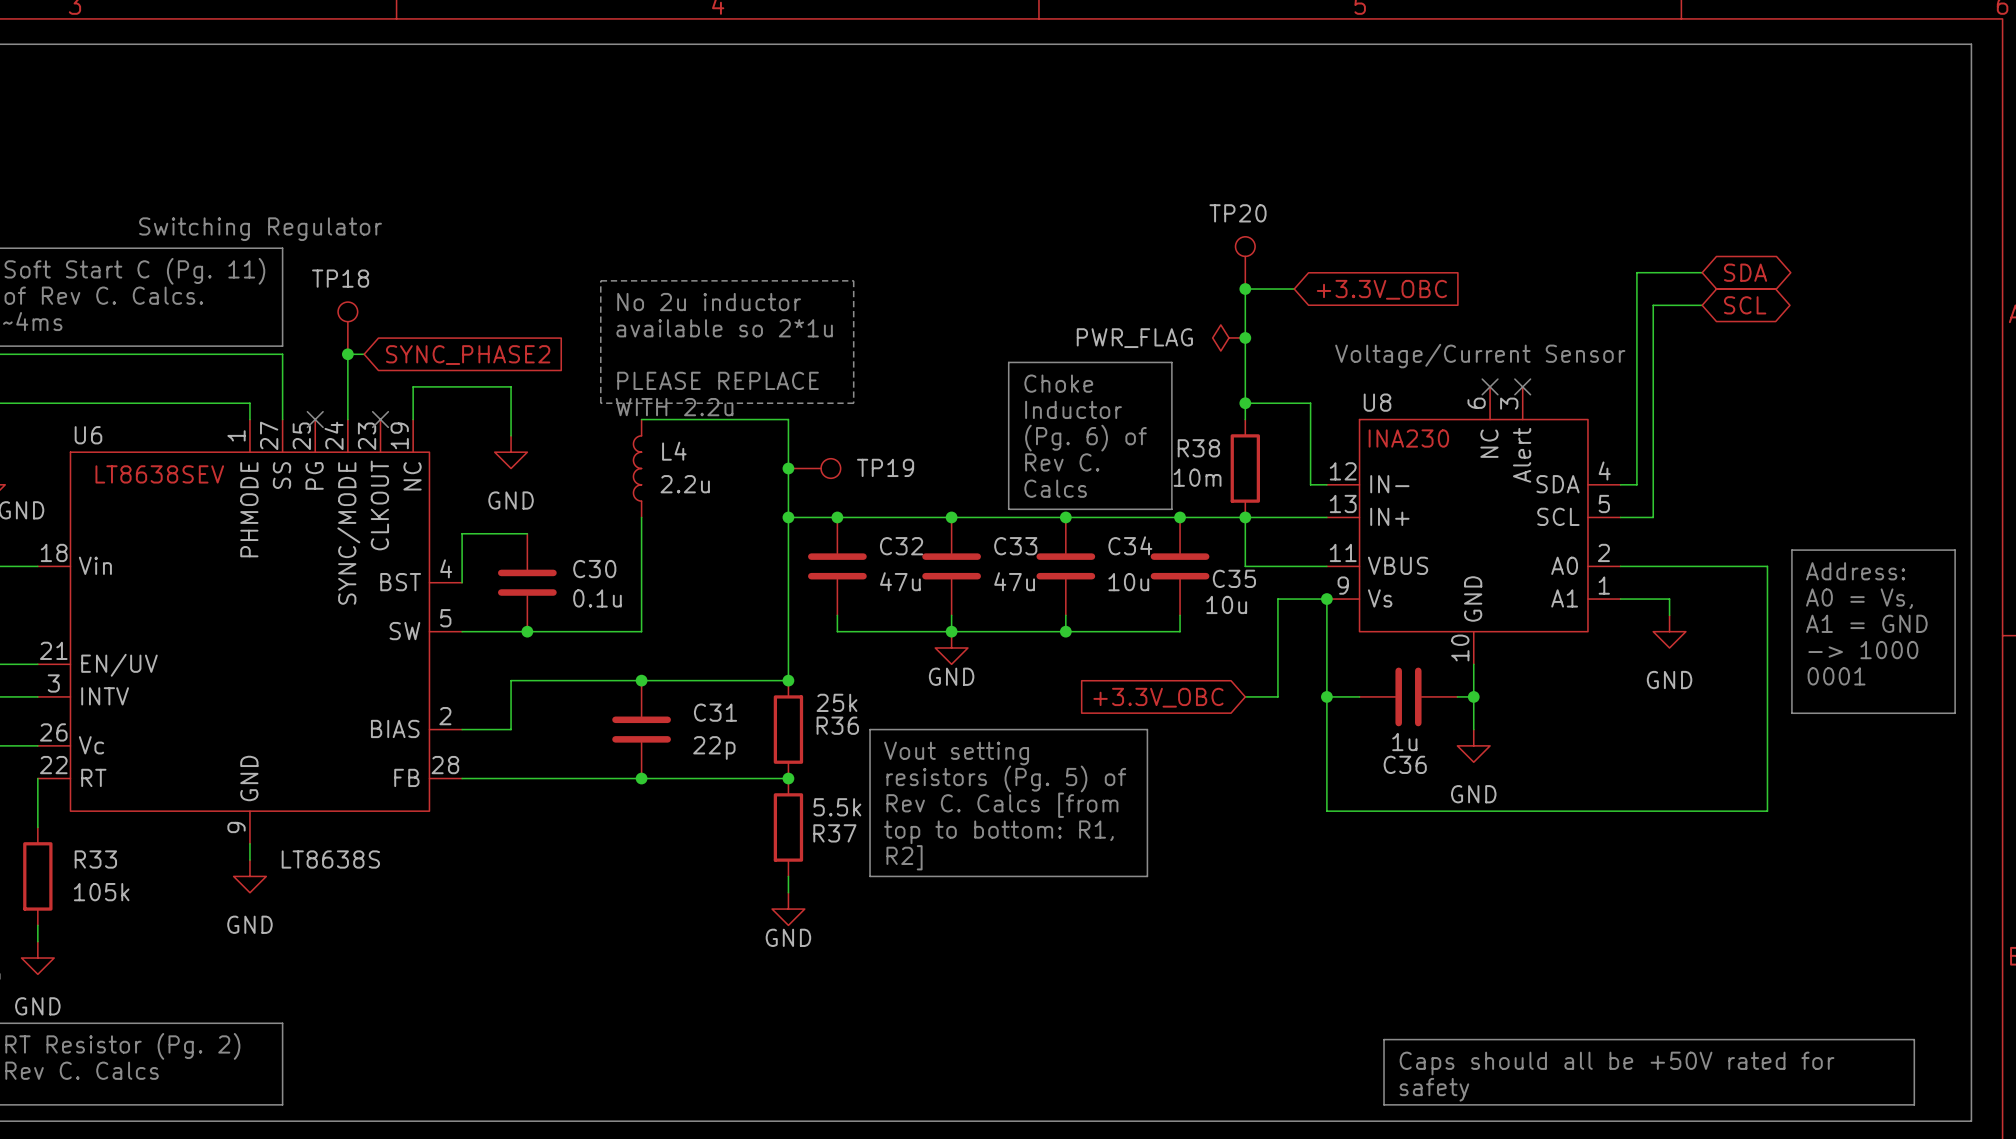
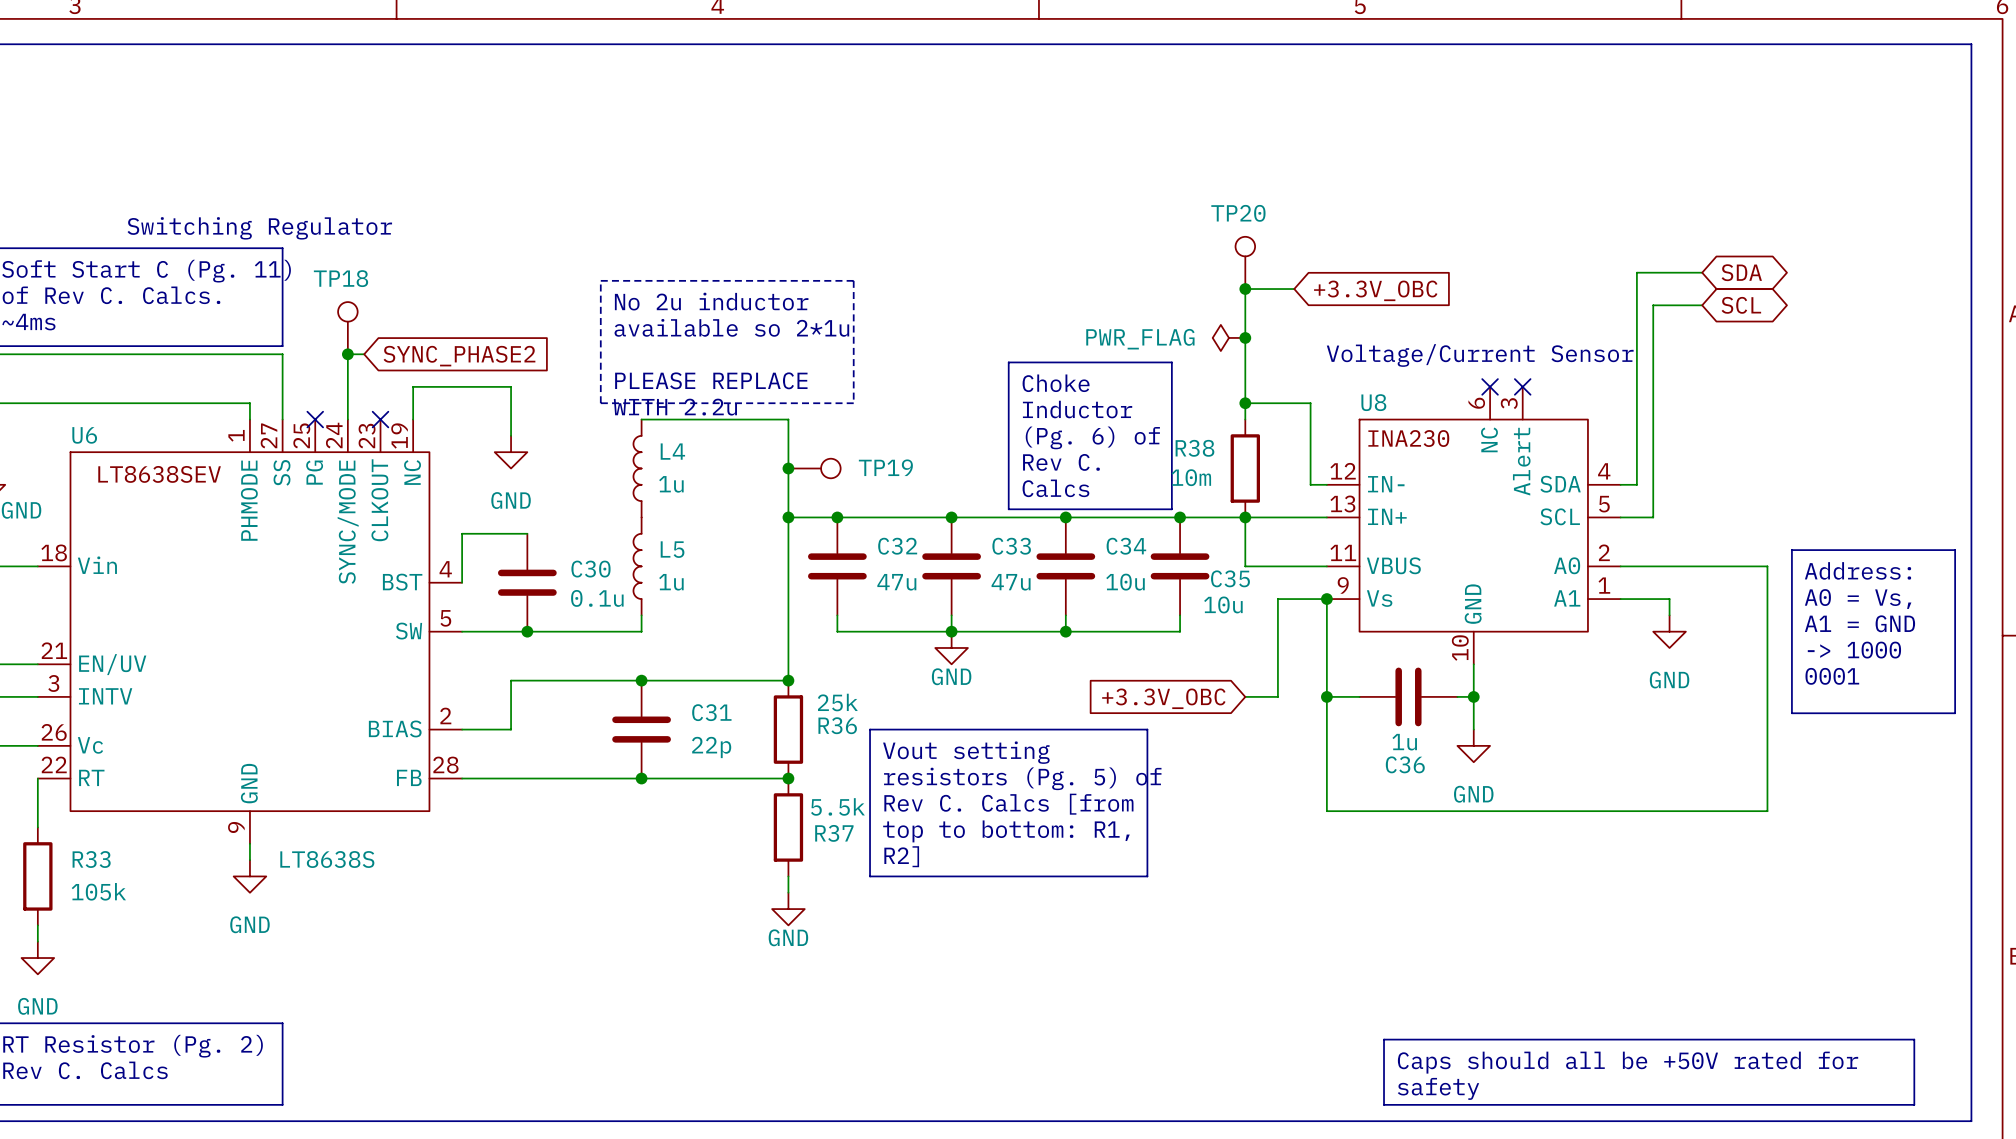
L4 value: 2.2u (685, 484) -> 1u (671, 484)
wire: (641, 517) (641, 615) -> none
L5: none -> 1u (637, 566)

